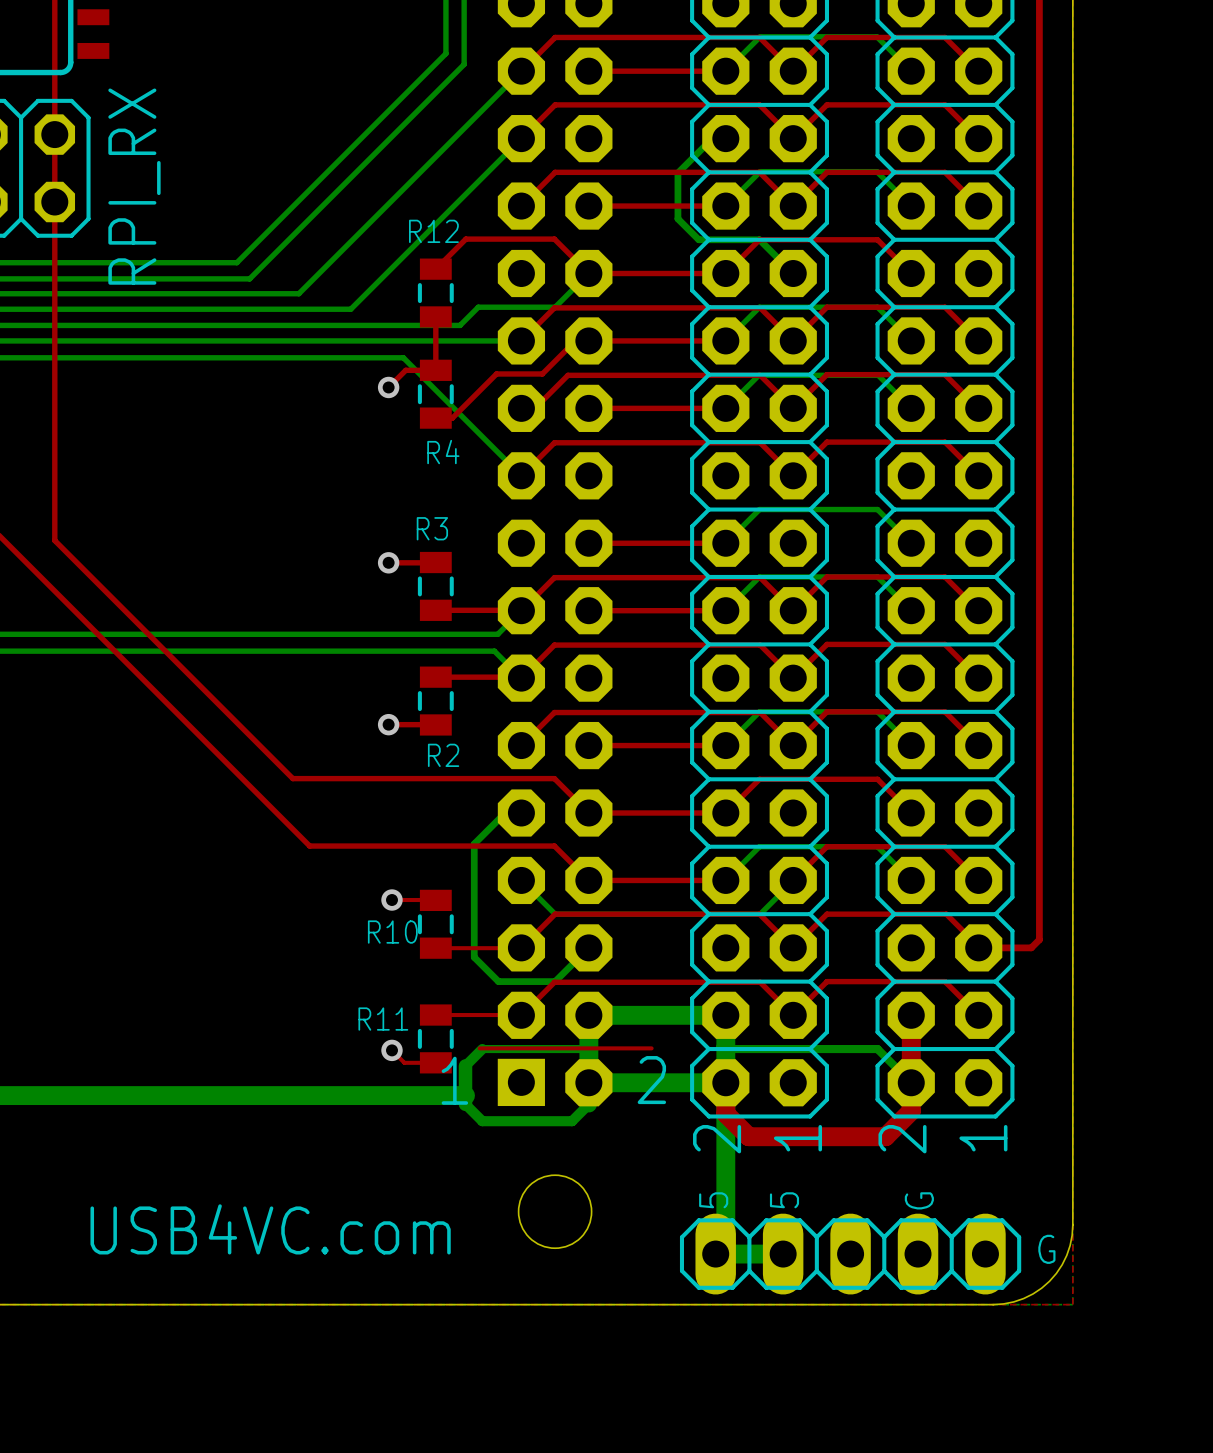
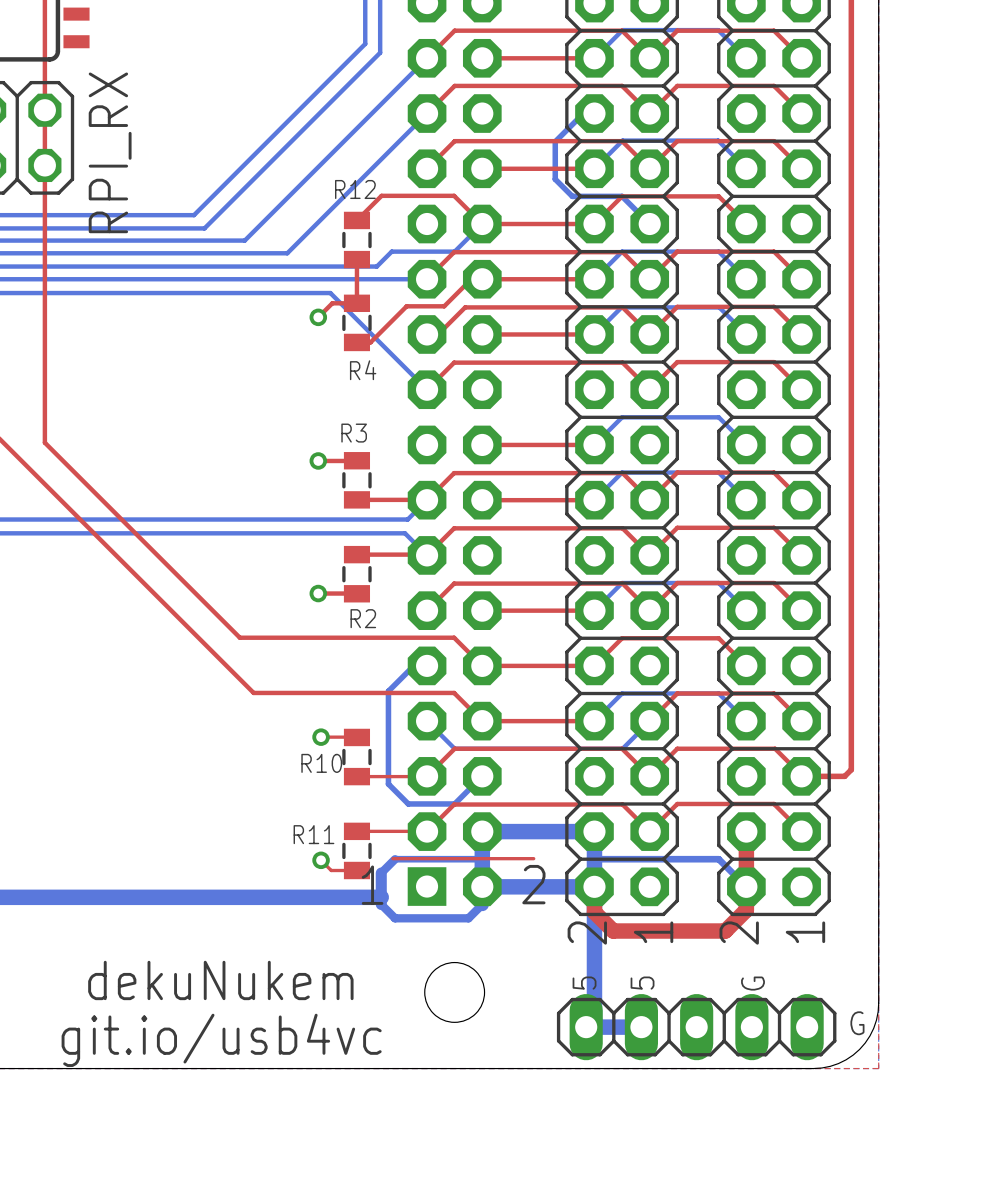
text: none -> dekuNukem (220, 980)
text: USB4VC.com (270, 1229) -> none
text: none -> git.io/usb4vc (221, 1040)

